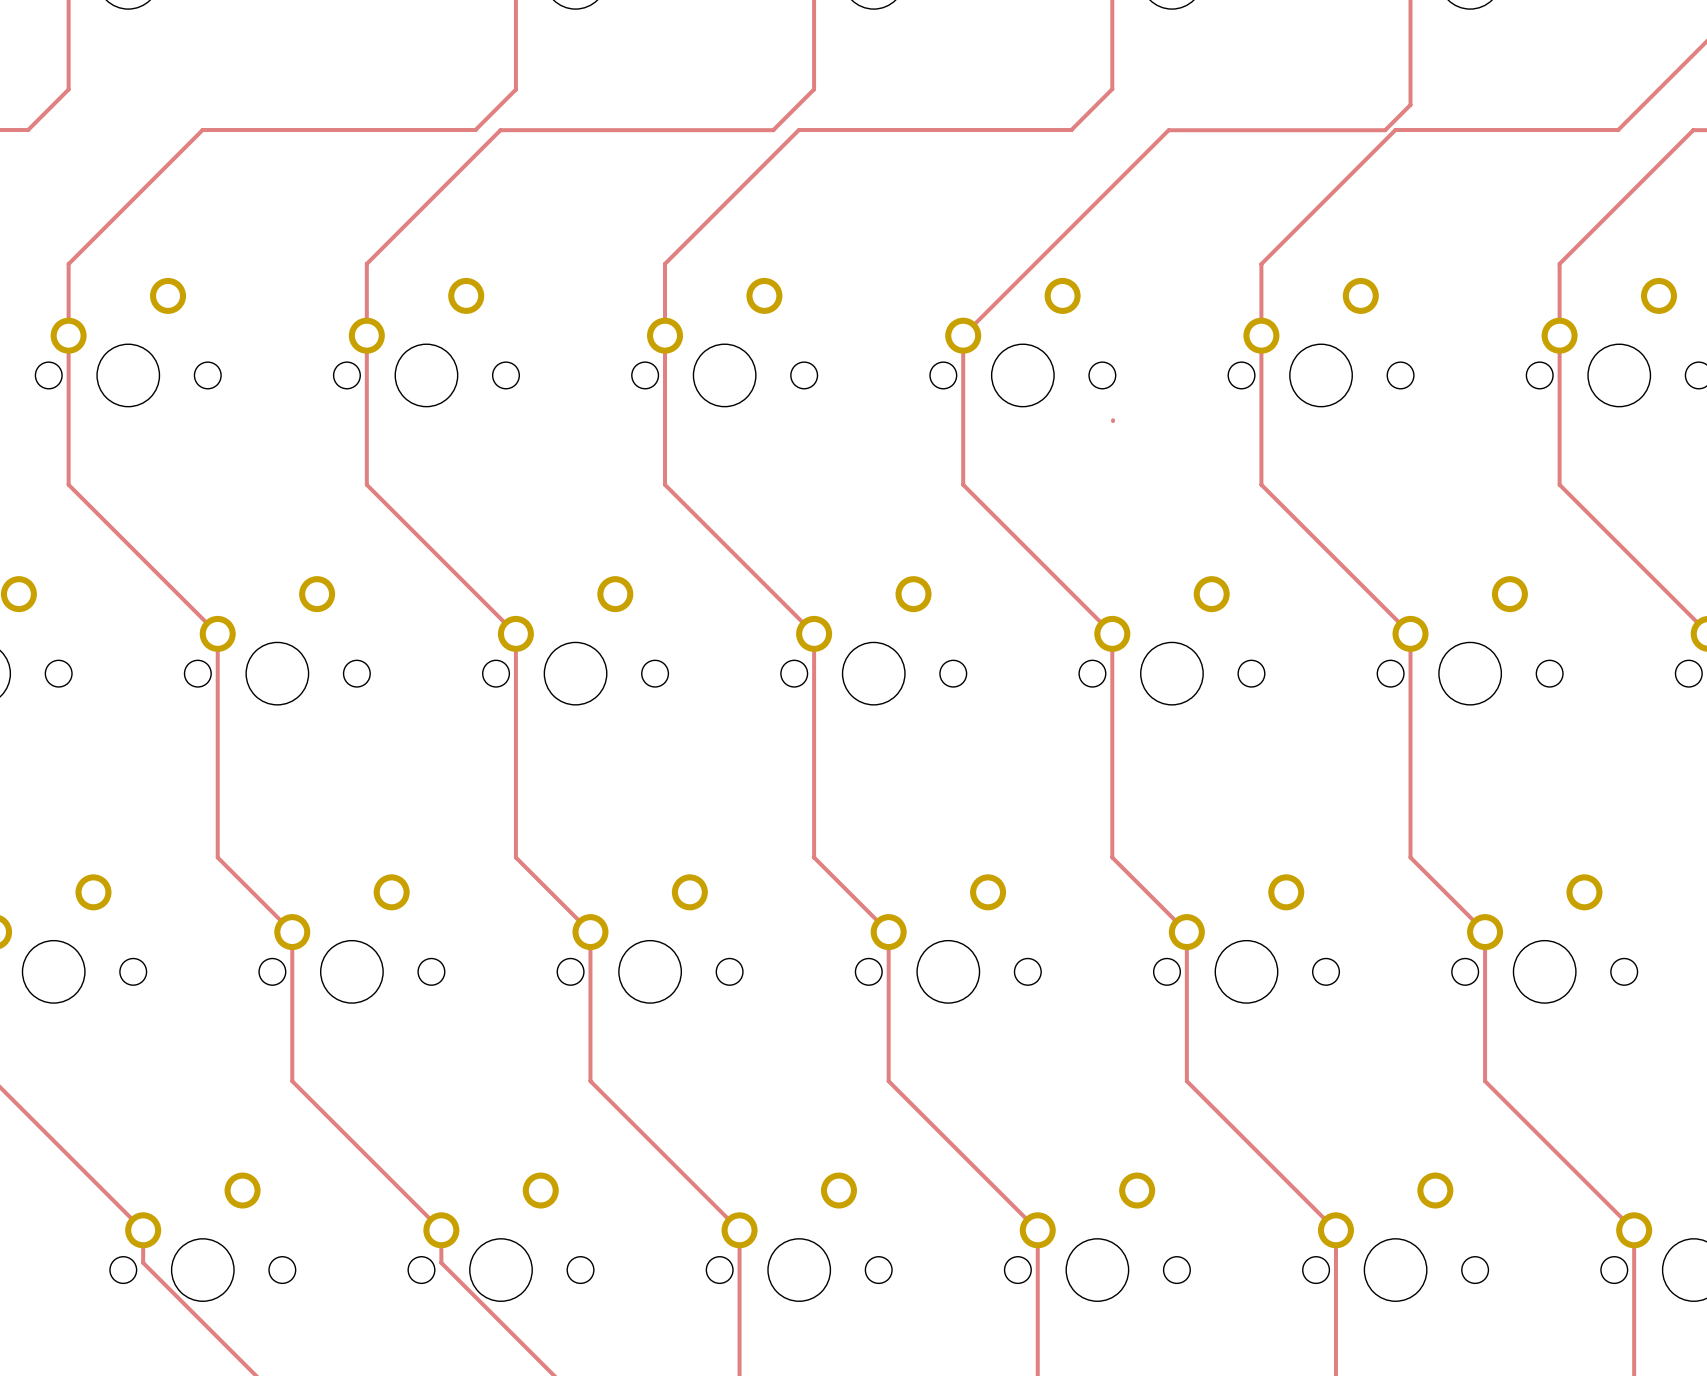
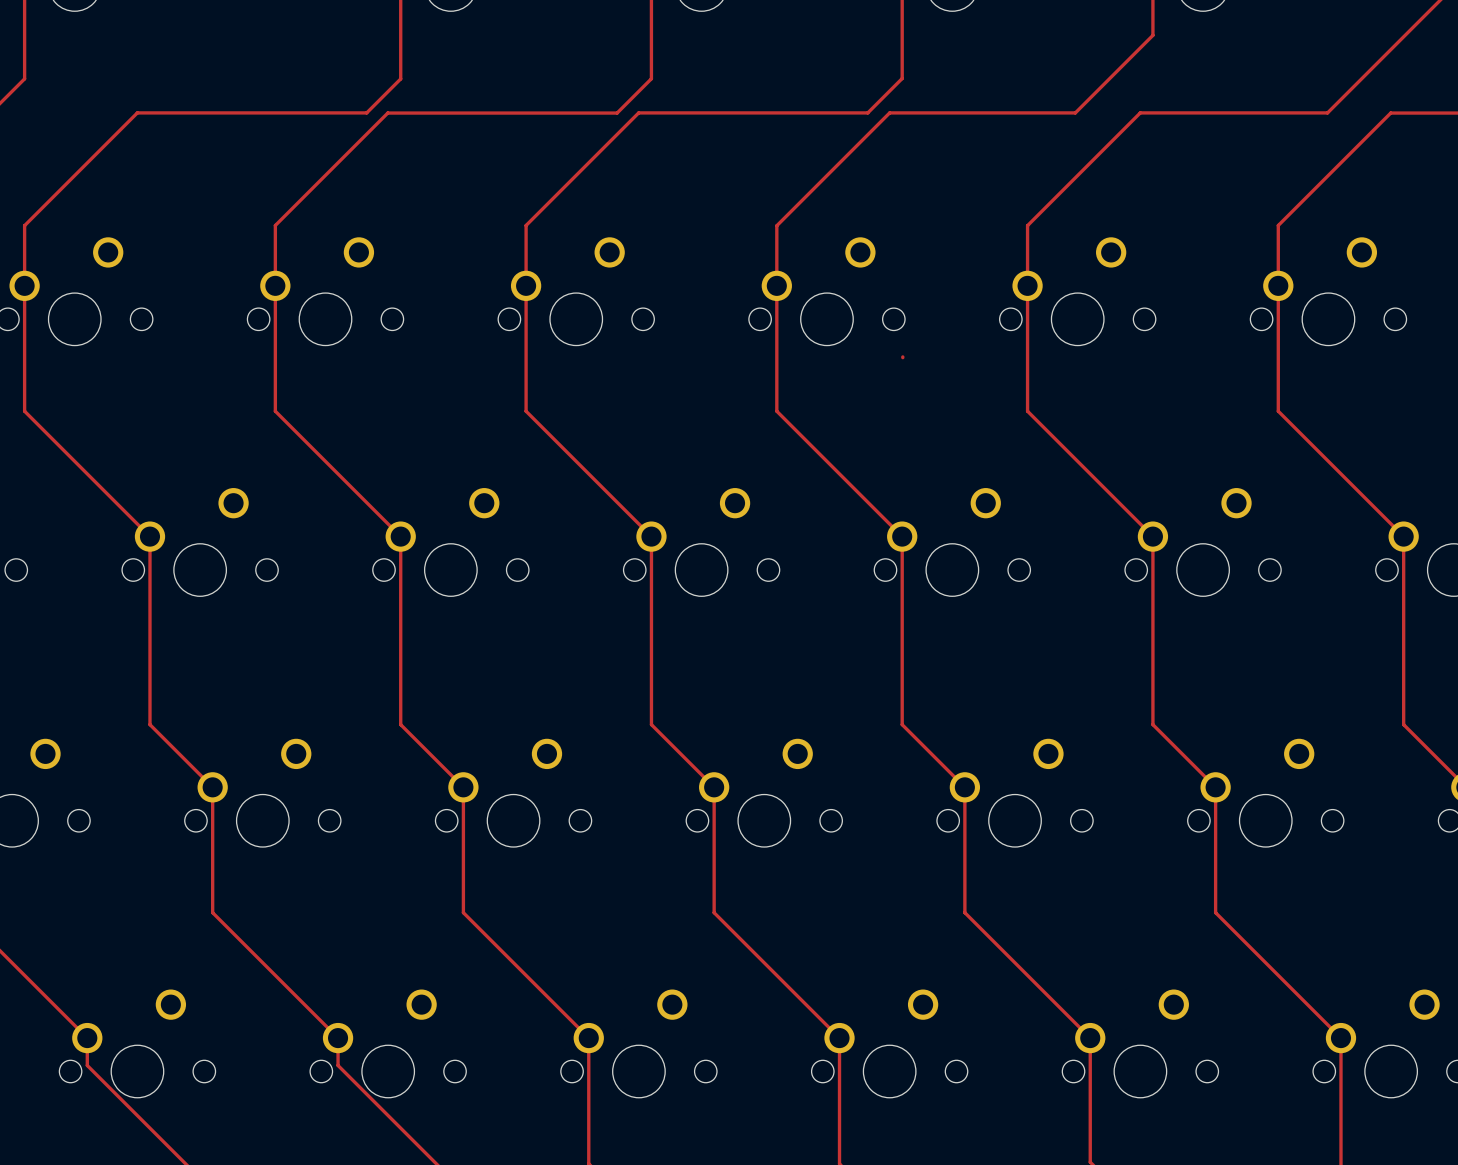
track: (1410, 37) (1410, 104) (1385, 130) (1168, 130) (963, 335) -> (1152, 35) (1075, 112) (889, 112) (776, 225) (776, 285)

